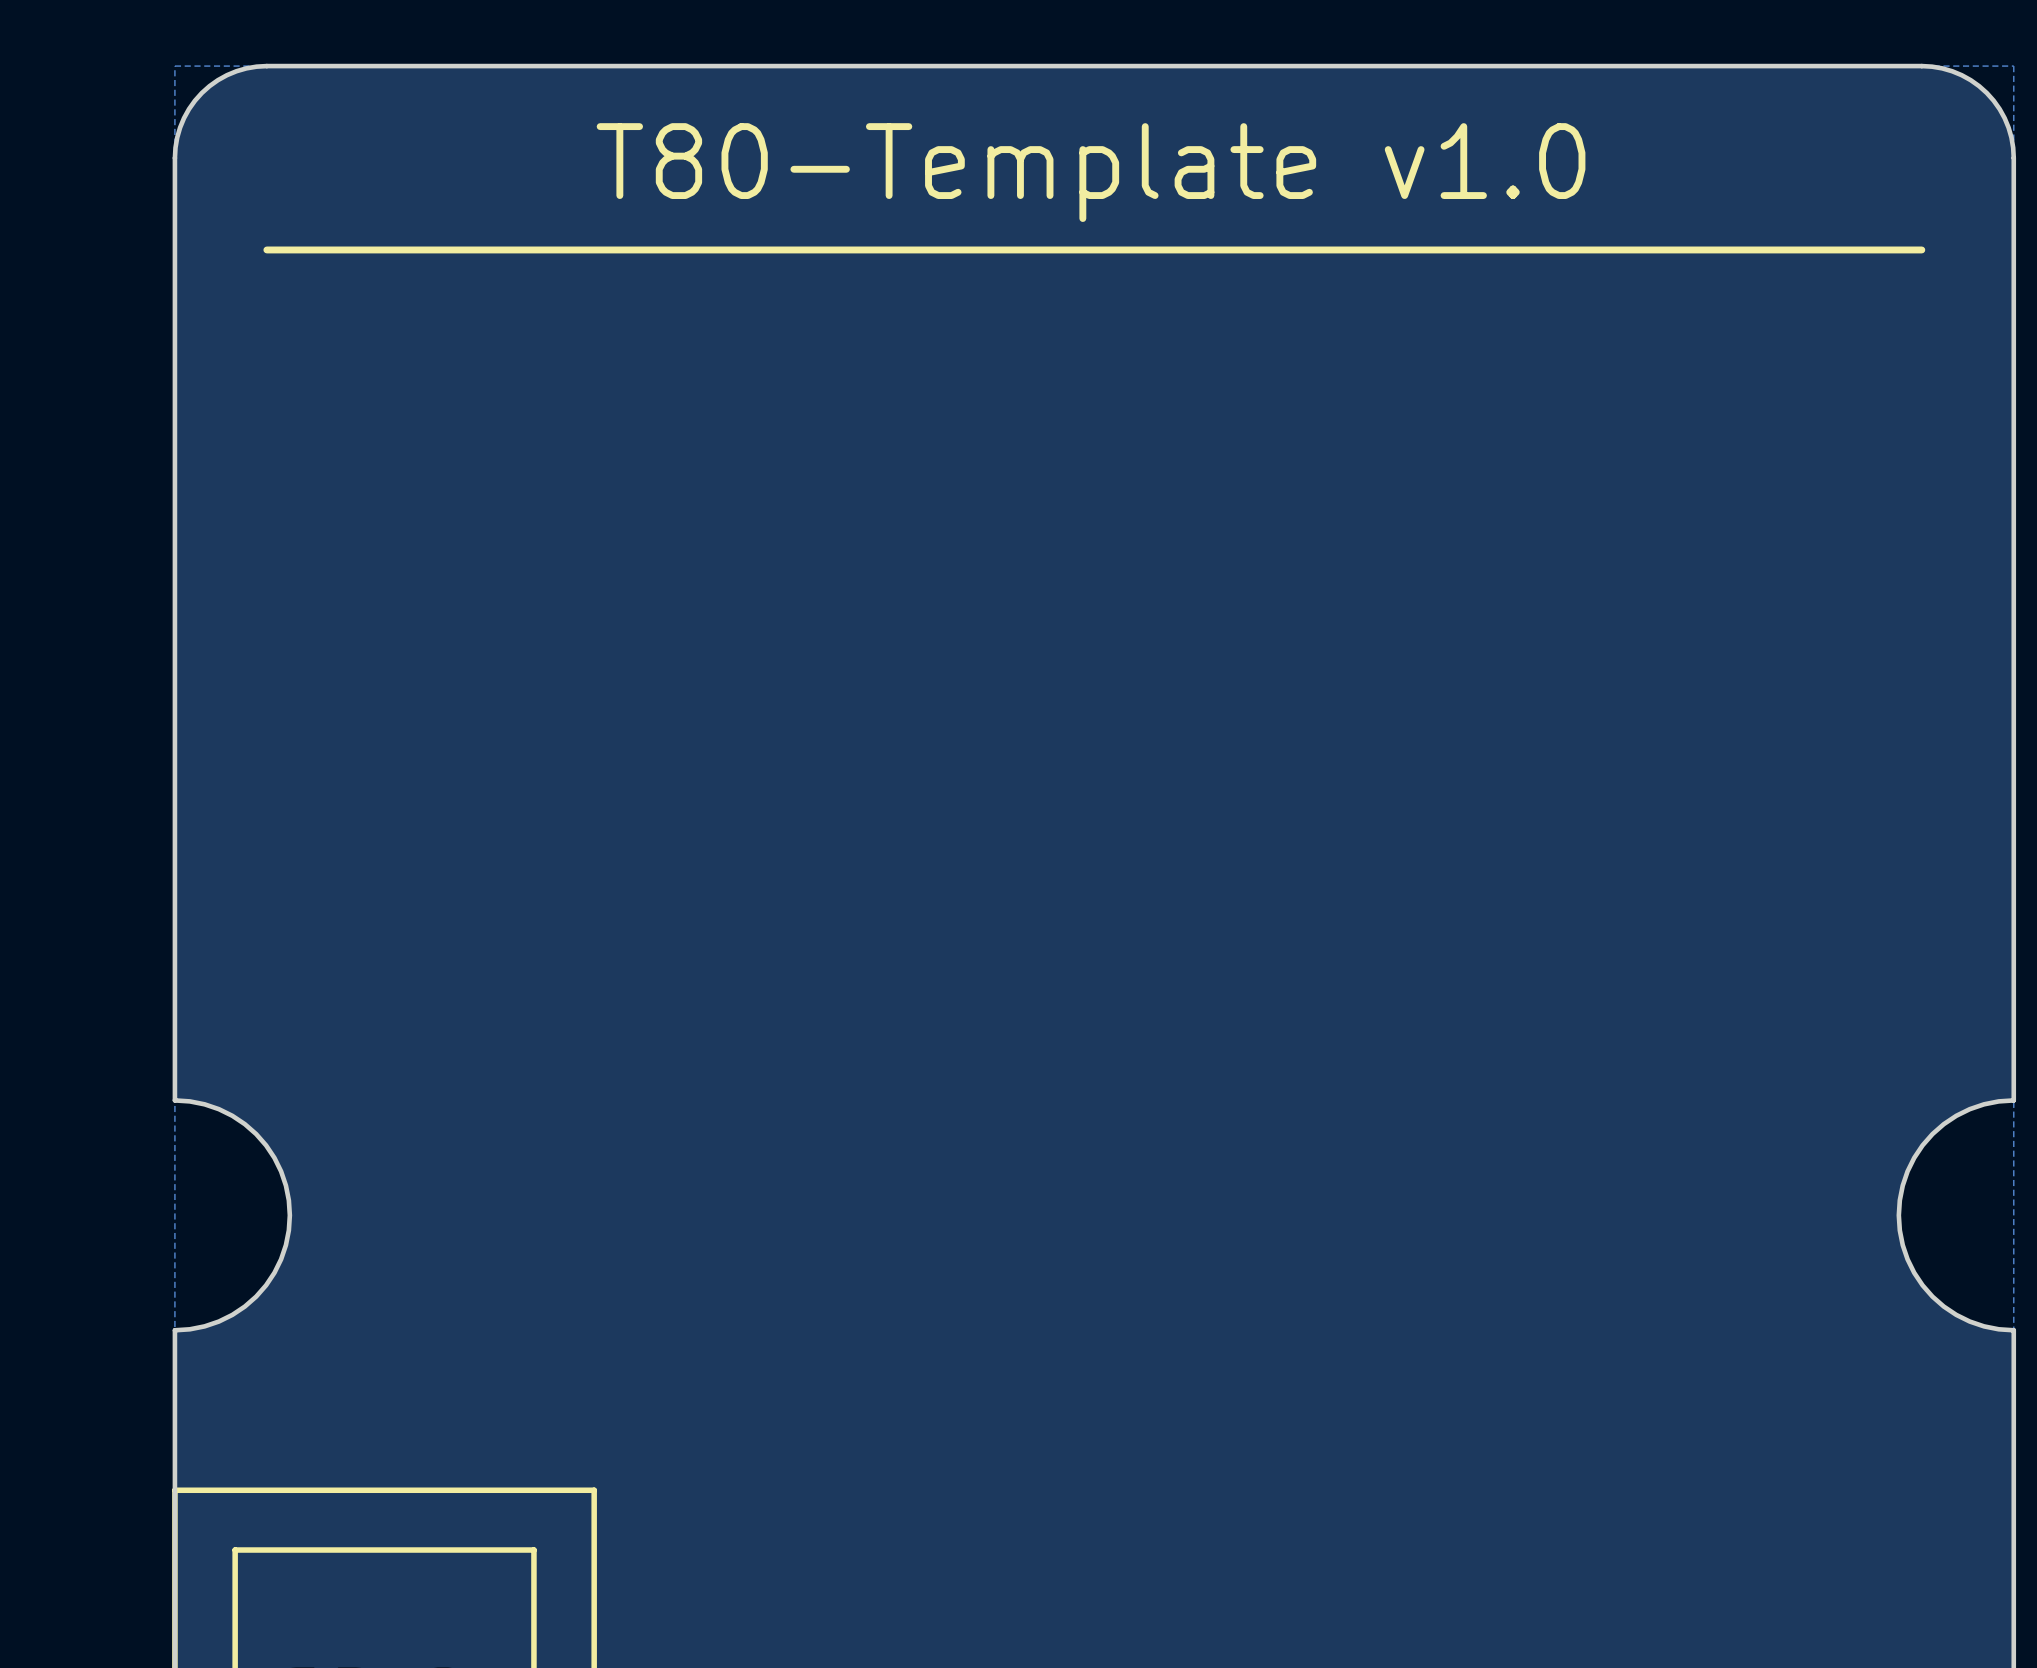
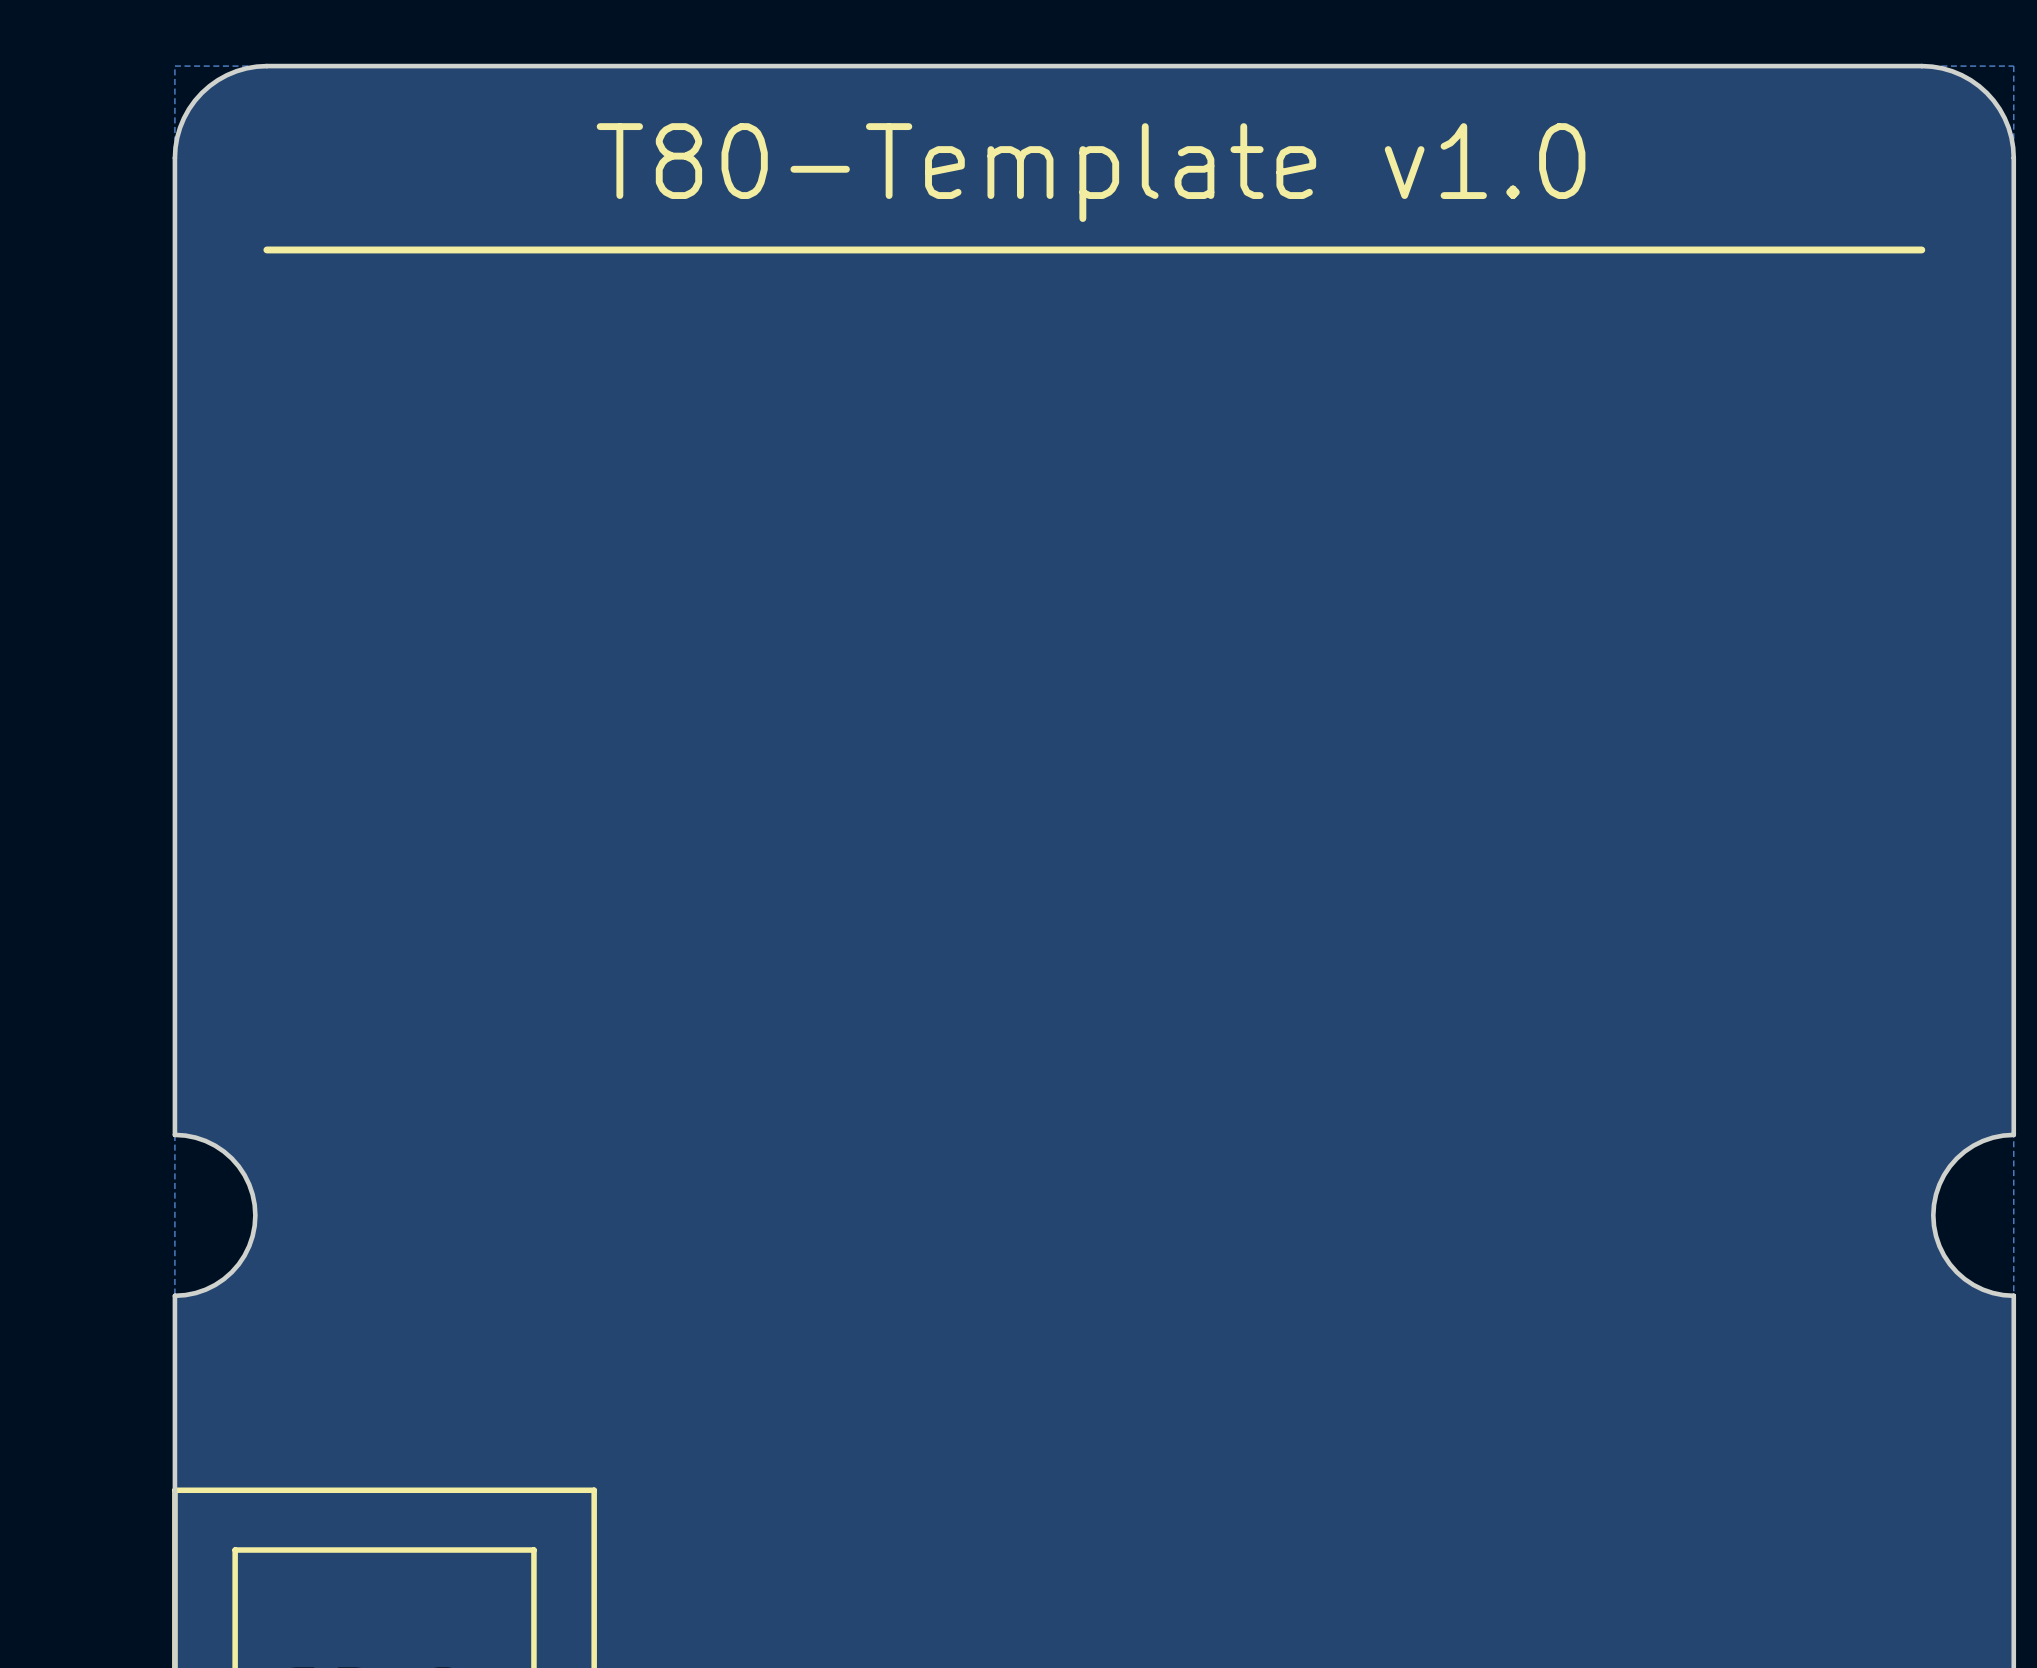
board edge: (174, 1100) (189, 1101) (218, 1109) (244, 1124) (256, 1134) (266, 1145) (281, 1171) (288, 1200) (289, 1215) (288, 1230) (281, 1259) (266, 1285) (256, 1296) (244, 1306) (218, 1321) (189, 1329) (174, 1330) -> (174, 1100) (174, 1134) (205, 1141) (231, 1158) (249, 1184) (255, 1215) (249, 1246) (231, 1272) (205, 1289) (174, 1295) (174, 1330)
board edge: (2013, 1100) (1998, 1101) (1969, 1109) (1943, 1124) (1932, 1134) (1922, 1145) (1907, 1171) (1899, 1200) (1898, 1215) (1899, 1230) (1907, 1259) (1922, 1285) (1932, 1296) (1943, 1306) (1969, 1321) (1998, 1329) (2013, 1330) -> (2013, 1100) (2013, 1134) (1982, 1141) (1956, 1158) (1939, 1184) (1933, 1215) (1939, 1246) (1956, 1272) (1982, 1289) (2013, 1295) (2013, 1330)

